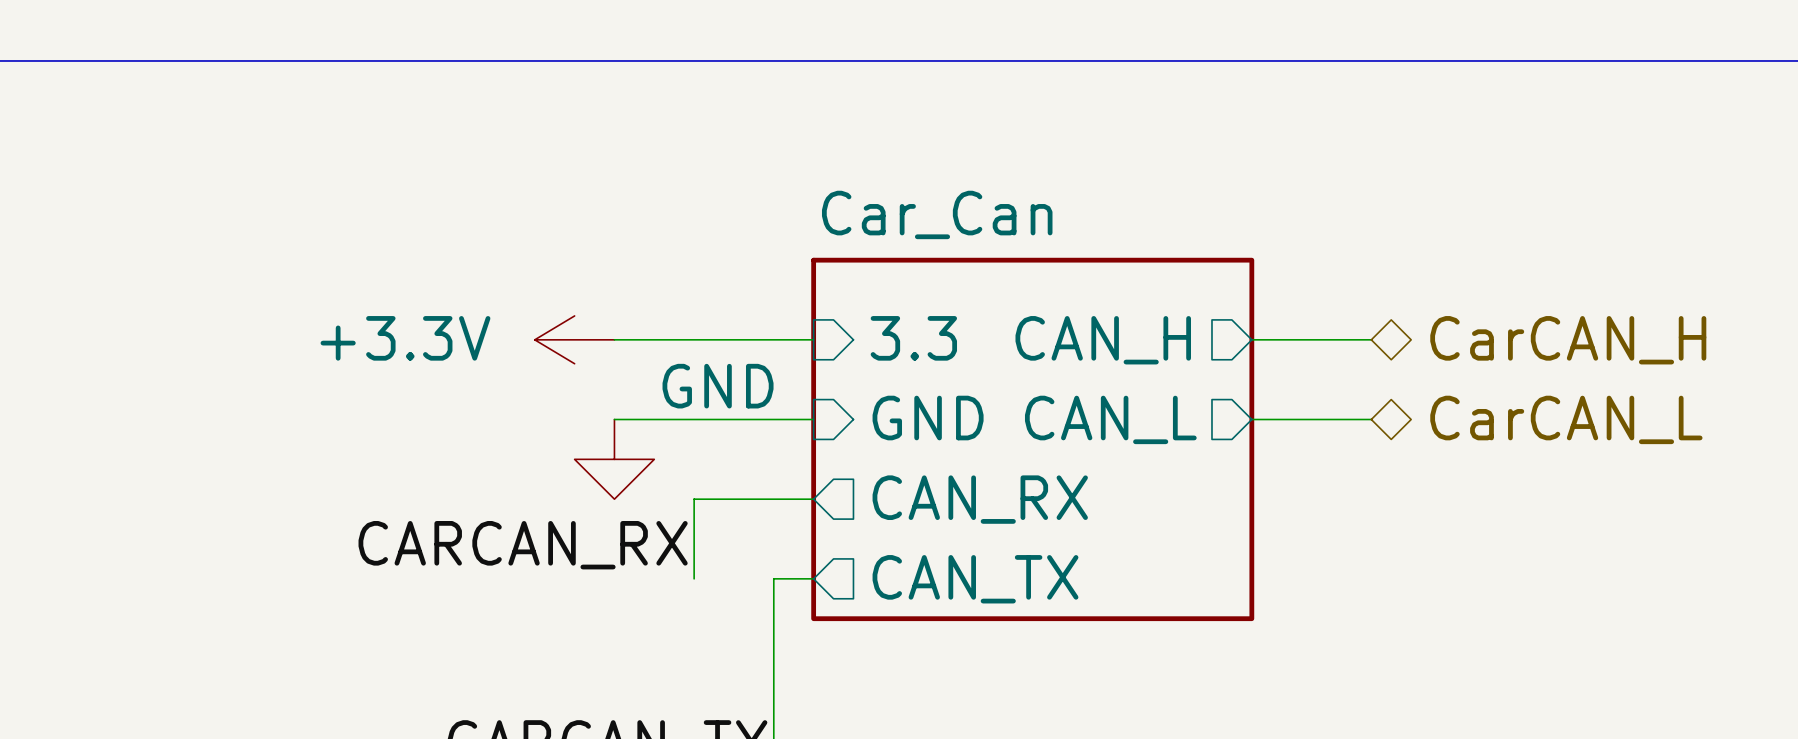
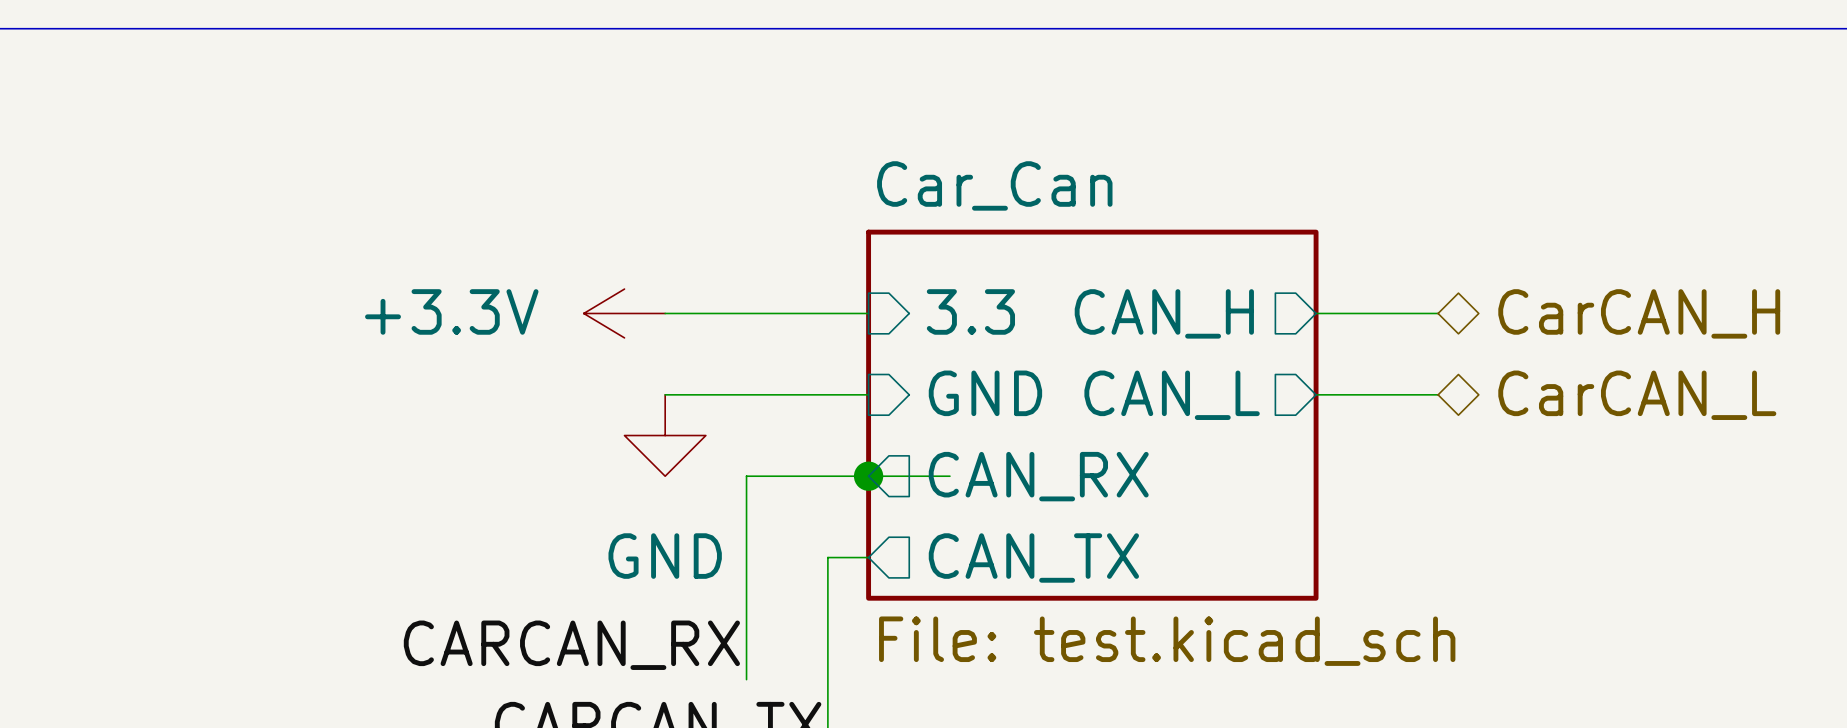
power symbol text position: GND (718, 386) -> GND (665, 556)
wire: none -> (868, 476) (949, 476)
junction: none -> (868, 476)
label position: CARCAN_RX (523, 545) -> CARCAN_RX (571, 645)
wire: none -> (746, 557) (746, 679)
sheet Car_Can value: none -> File: test.kicad_sch (1167, 641)

